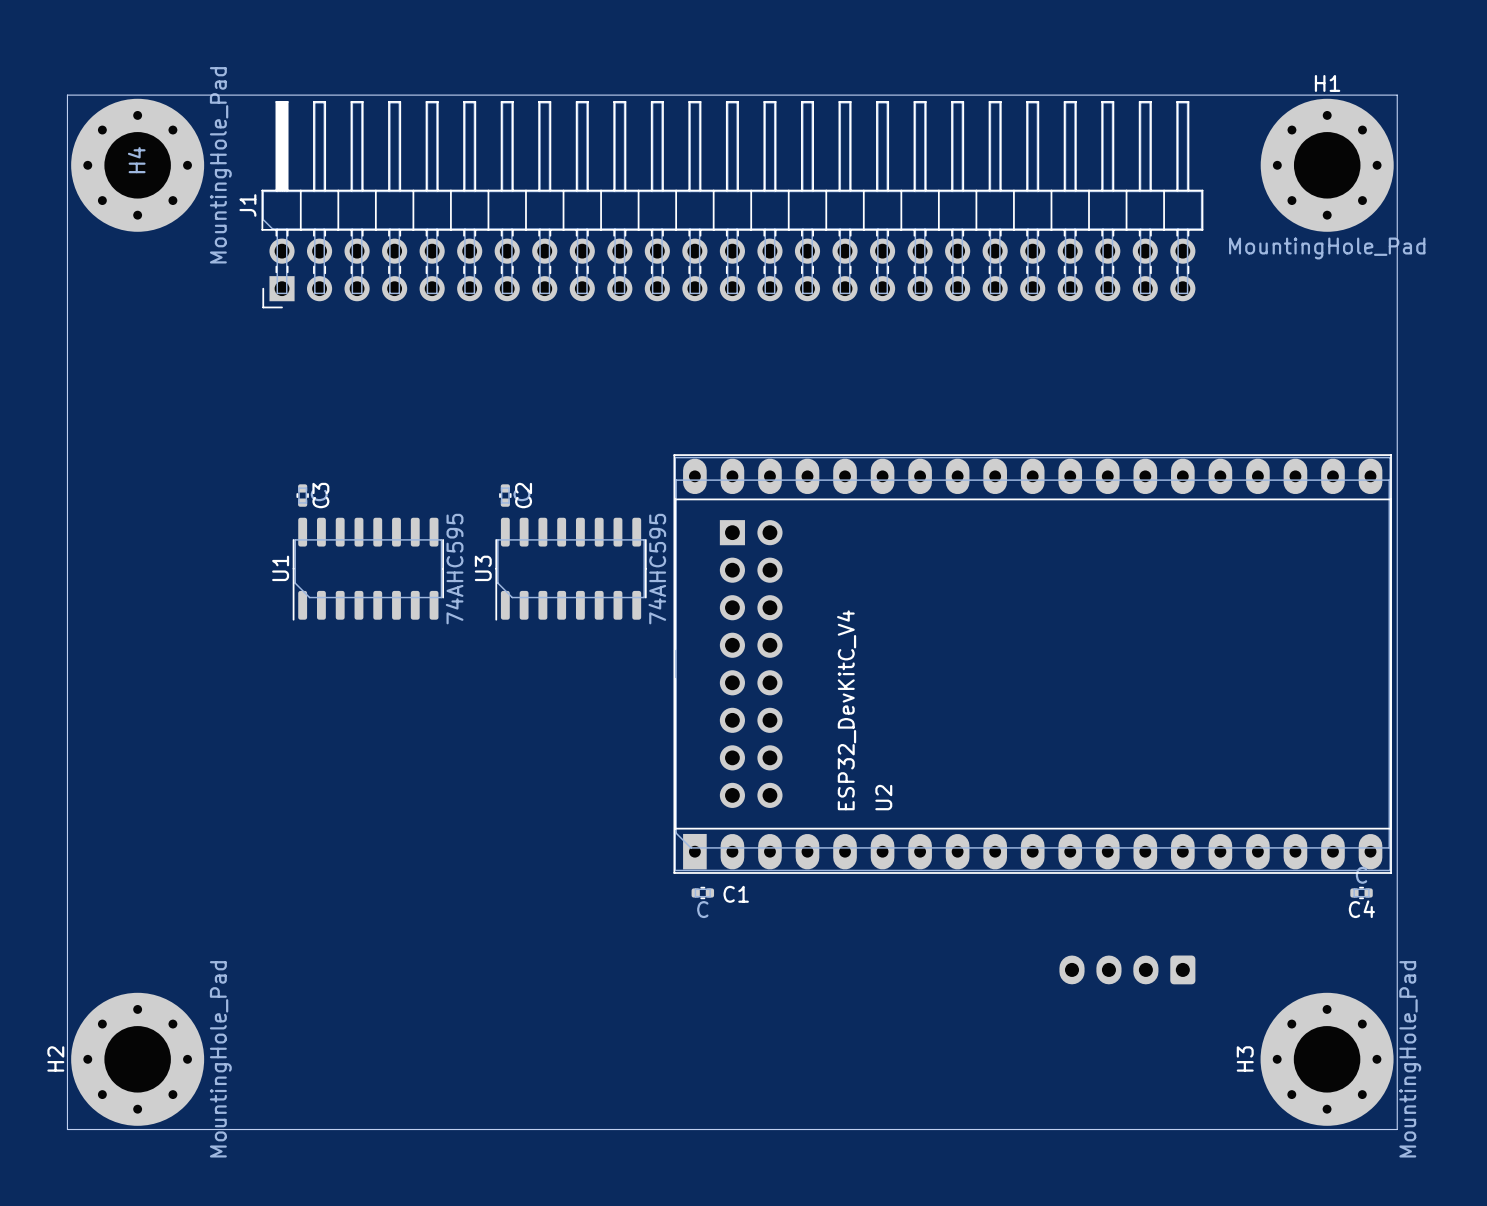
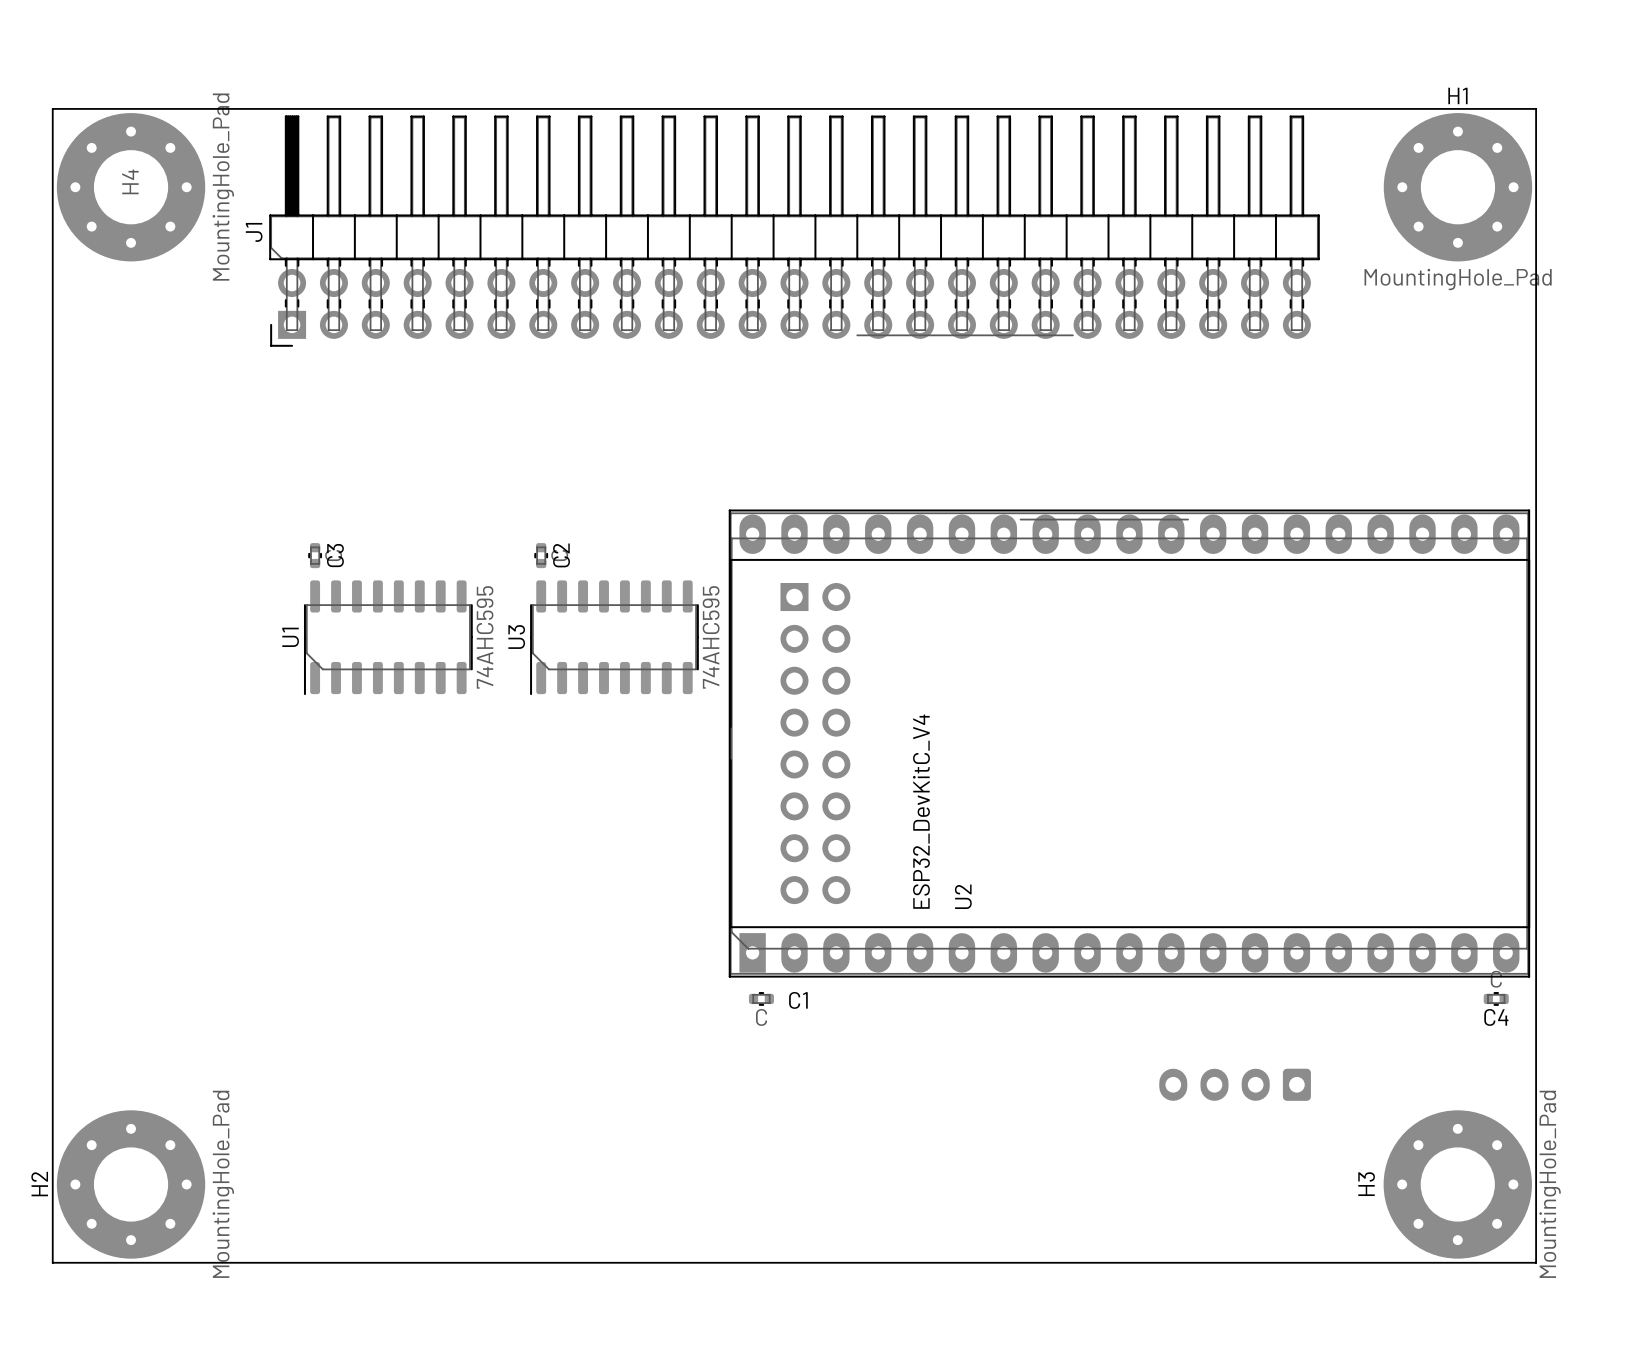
line: none -> (857, 335) (1072, 335)
line: none -> (1020, 519) (1188, 519)

